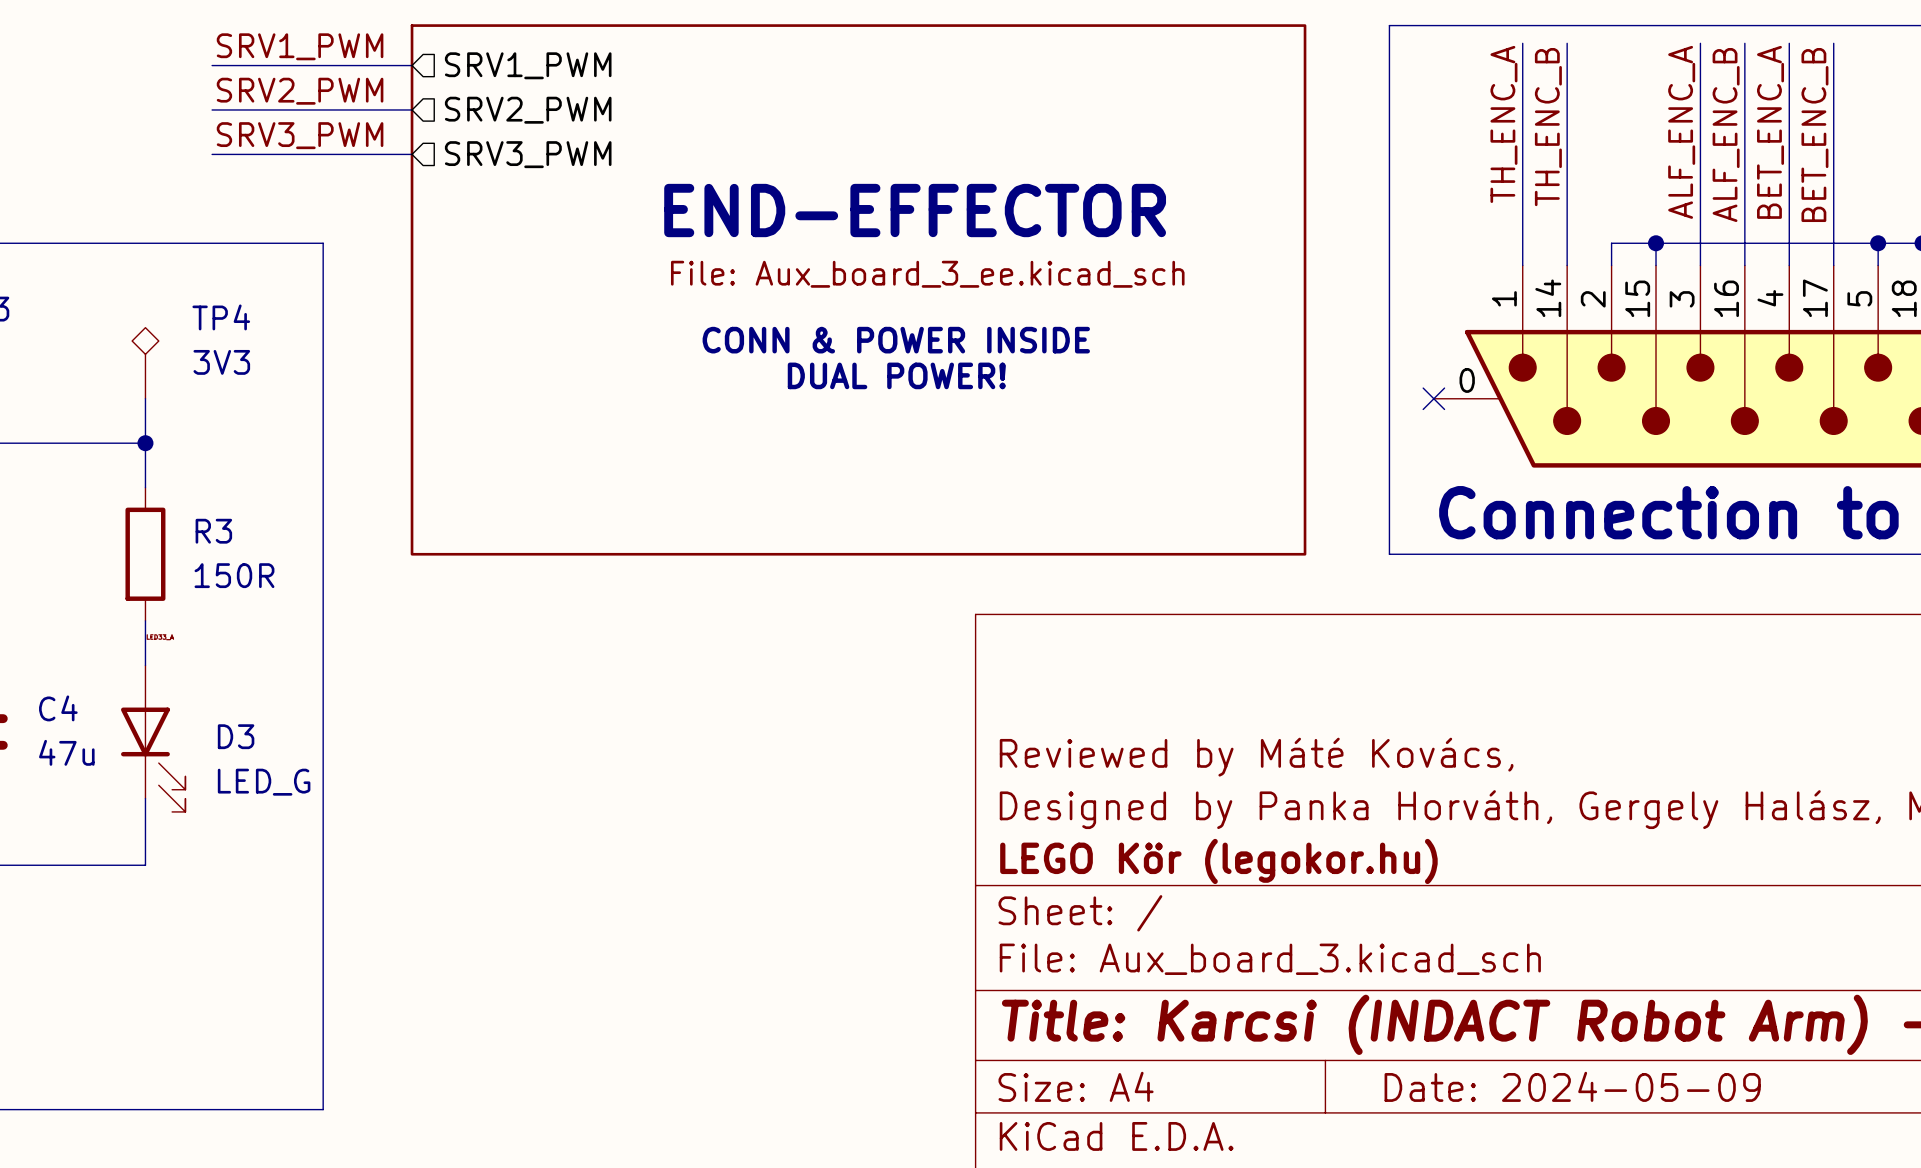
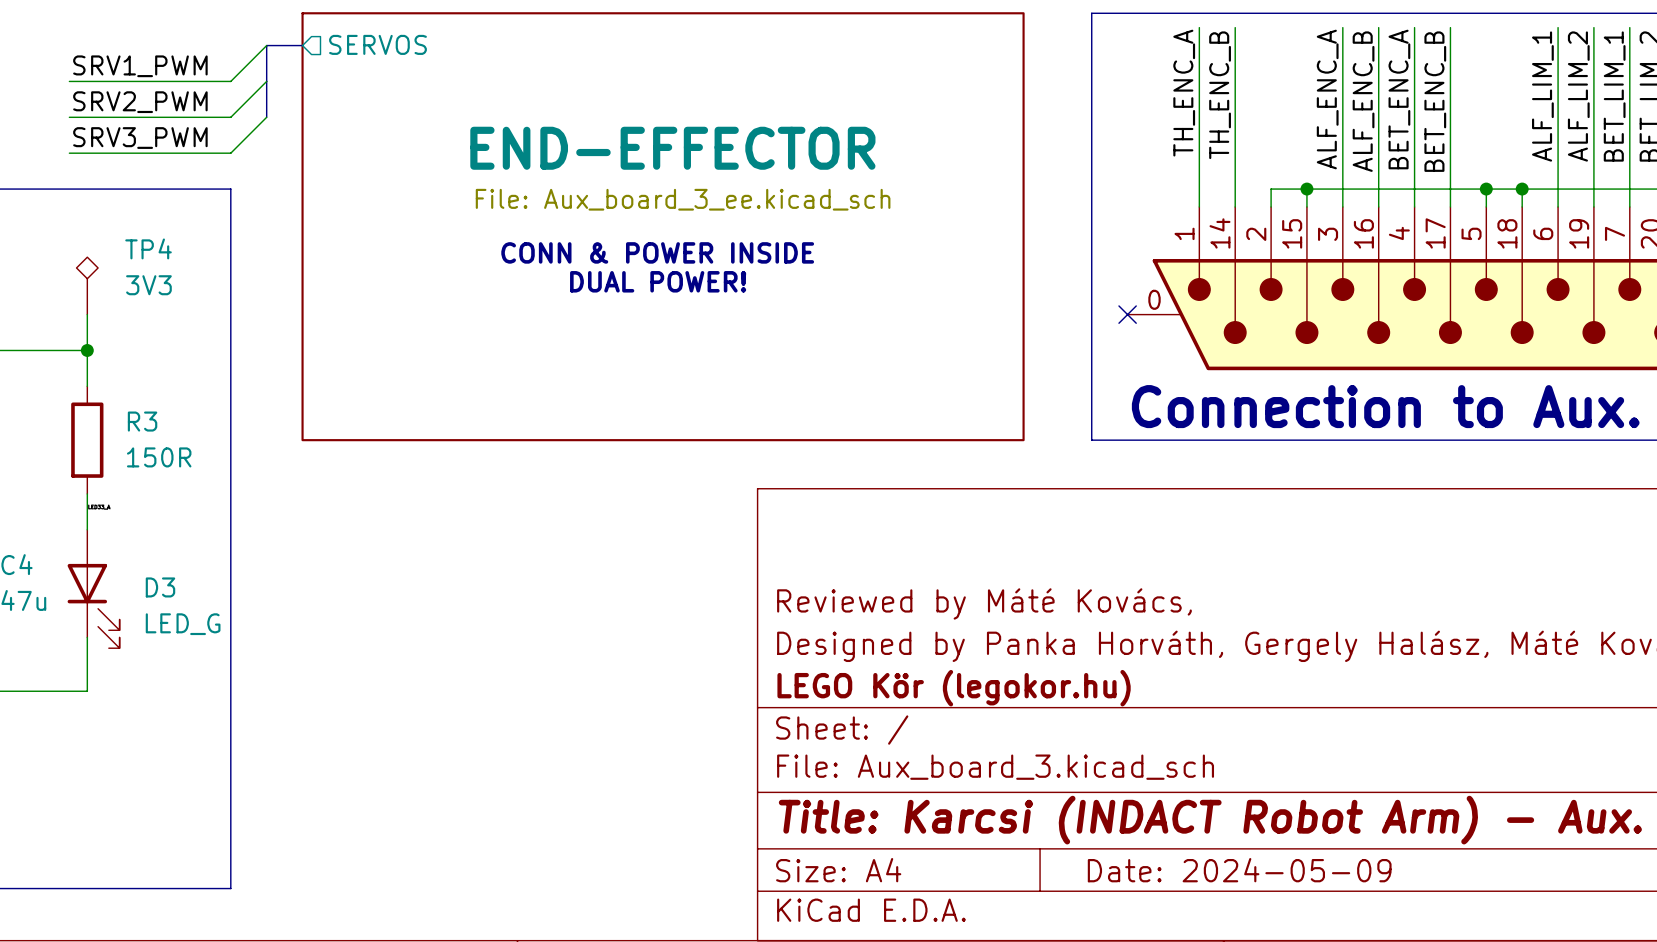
label position: SRV1_PWM (300, 46) -> SRV1_PWM (140, 66)
wire: (212, 65) (412, 65) -> none
bus: none -> (302, 45) (266, 45) (266, 117)
sheet pin: SRV1_PWM (528, 65) -> SERVOS (377, 44)
label position: SRV2_PWM (300, 91) -> SRV2_PWM (140, 102)
wire: none -> (69, 81) (141, 81)
wire: (323, 109) (412, 109) -> (230, 81) (266, 45)
sheet pin: SRV2_PWM (528, 110) -> none
label position: SRV3_PWM (300, 135) -> SRV3_PWM (140, 138)
wire: none -> (69, 117) (141, 117)
wire: (323, 154) (412, 154) -> (230, 117) (266, 81)
wire: none -> (266, 117) (230, 153) (69, 153)
sheet pin: SRV3_PWM (528, 154) -> none
sheet END-EFFECTOR name position: END-EFFECTOR (915, 210) -> END-EFFECTOR (672, 148)
sheet END-EFFECTOR value position: File: Aux_board_3_ee.kicad_sch (927, 274) -> File: Aux_board_3_ee.kicad_sch (683, 199)
text position: CONN & POWER INSIDE (896, 340) -> CONN & POWER INSIDE (657, 252)
text position: DUAL POWER! (896, 375) -> DUAL POWER! (658, 281)

